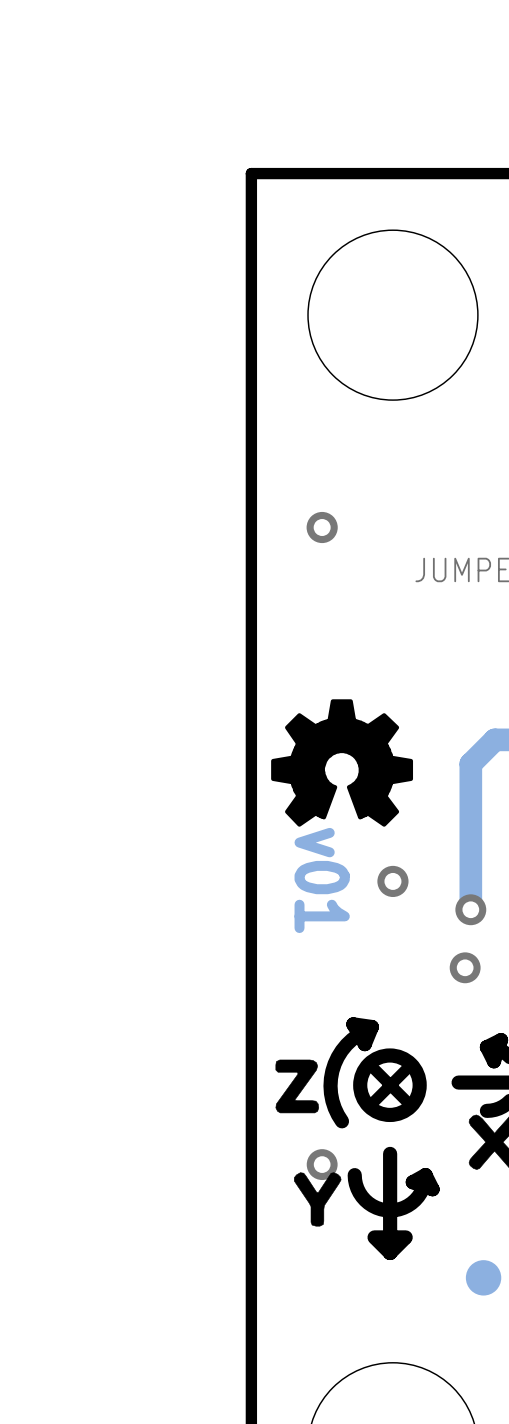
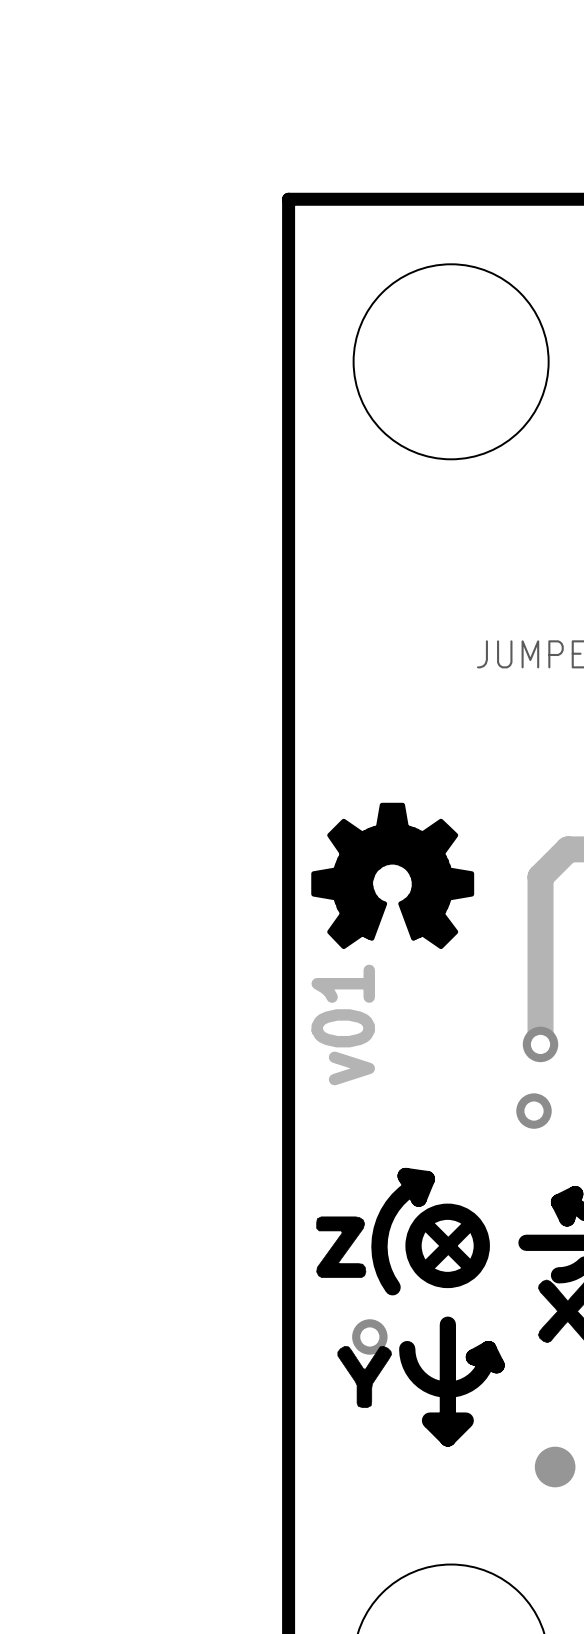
via: (322, 527) -> none
text rotation: 0° (322, 880) -> 180° (343, 1024)
via: (392, 881) -> none

